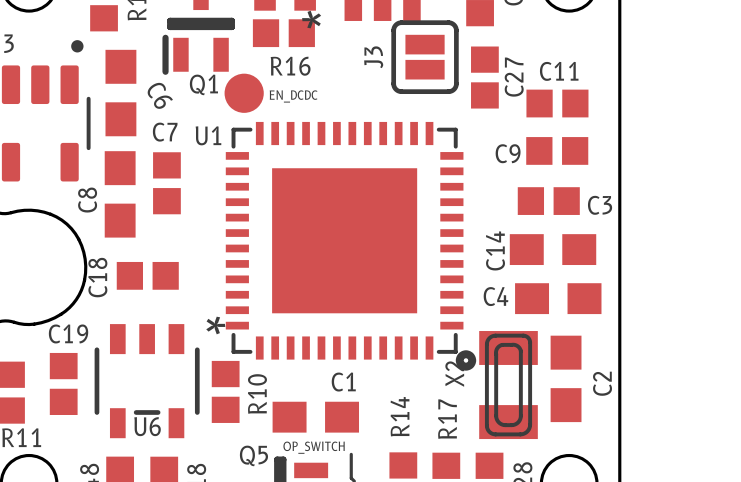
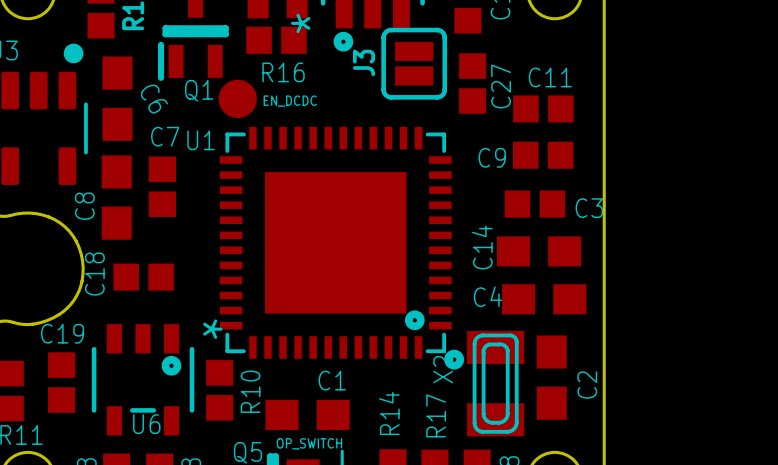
drawing: none -> [333, 31, 354, 52]
drawing: none -> [63, 43, 84, 64]
drawing: none -> [404, 310, 425, 331]
drawing: none -> [161, 355, 182, 376]

